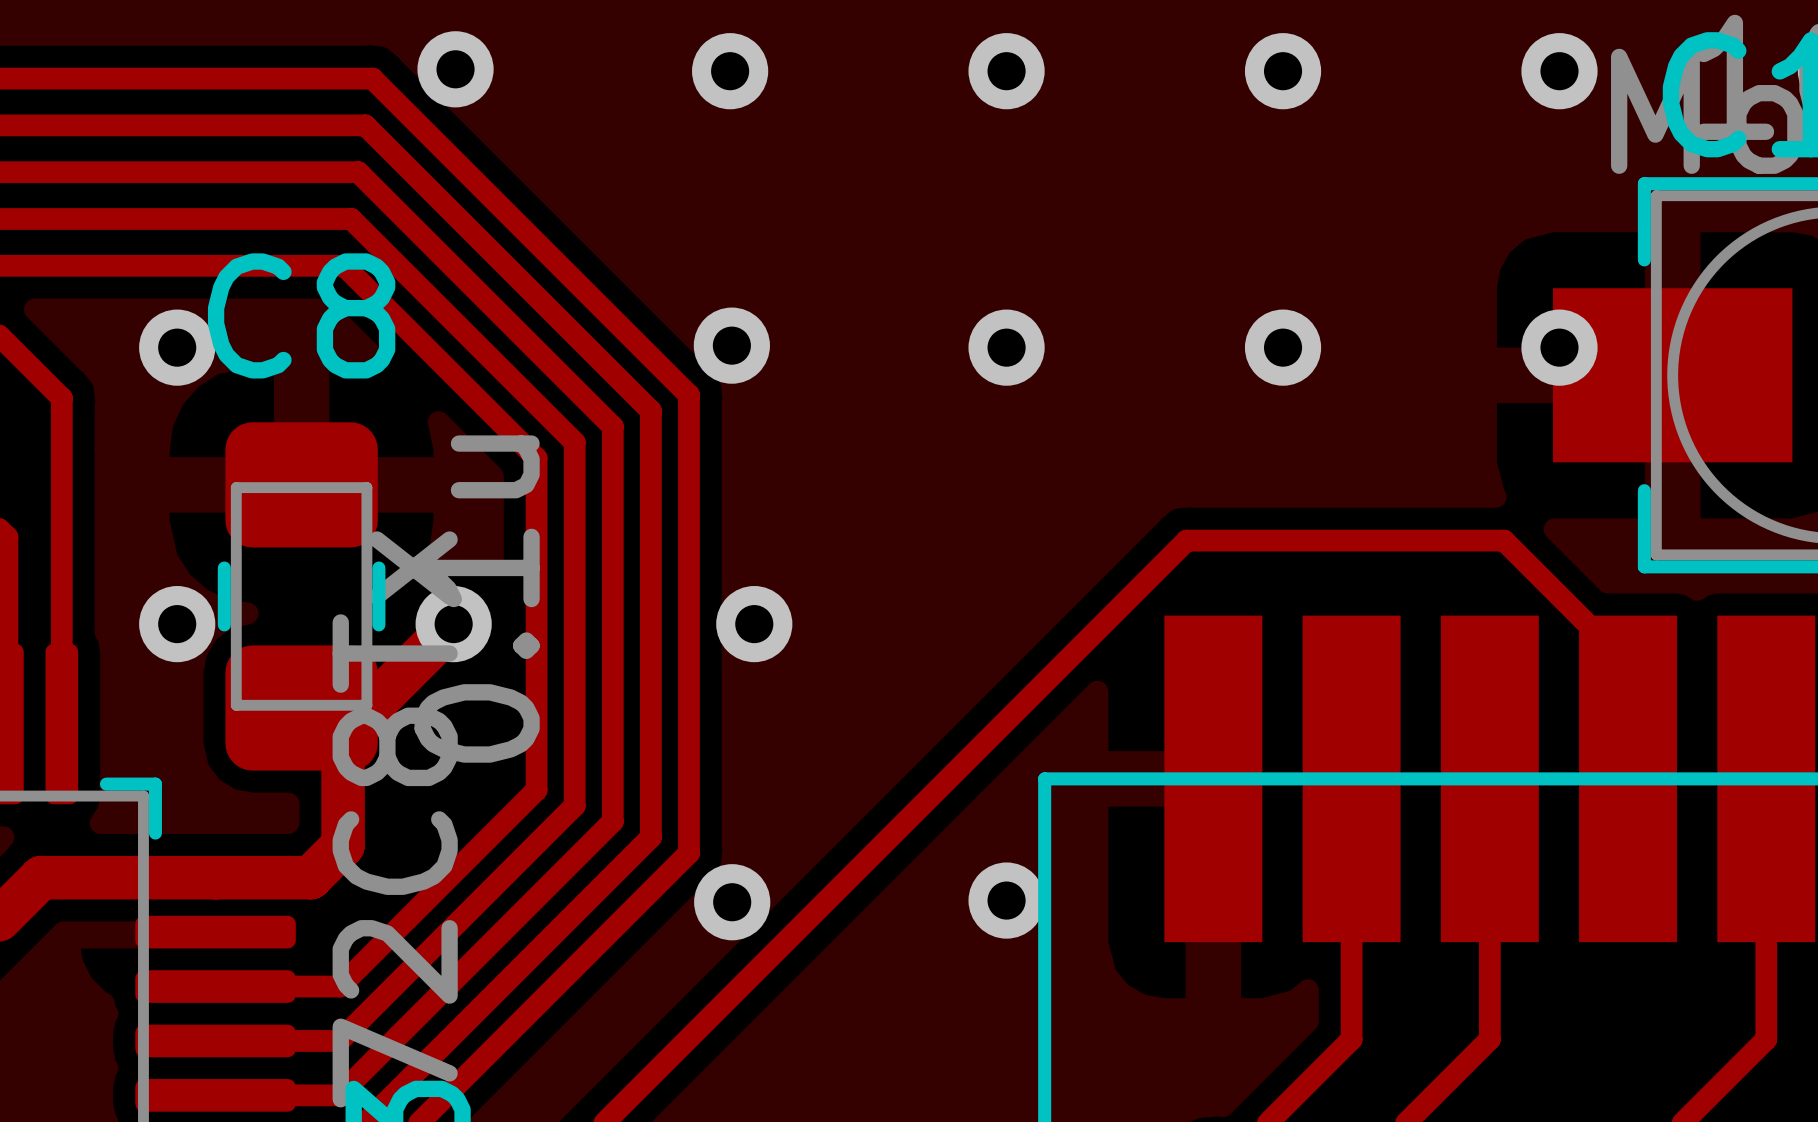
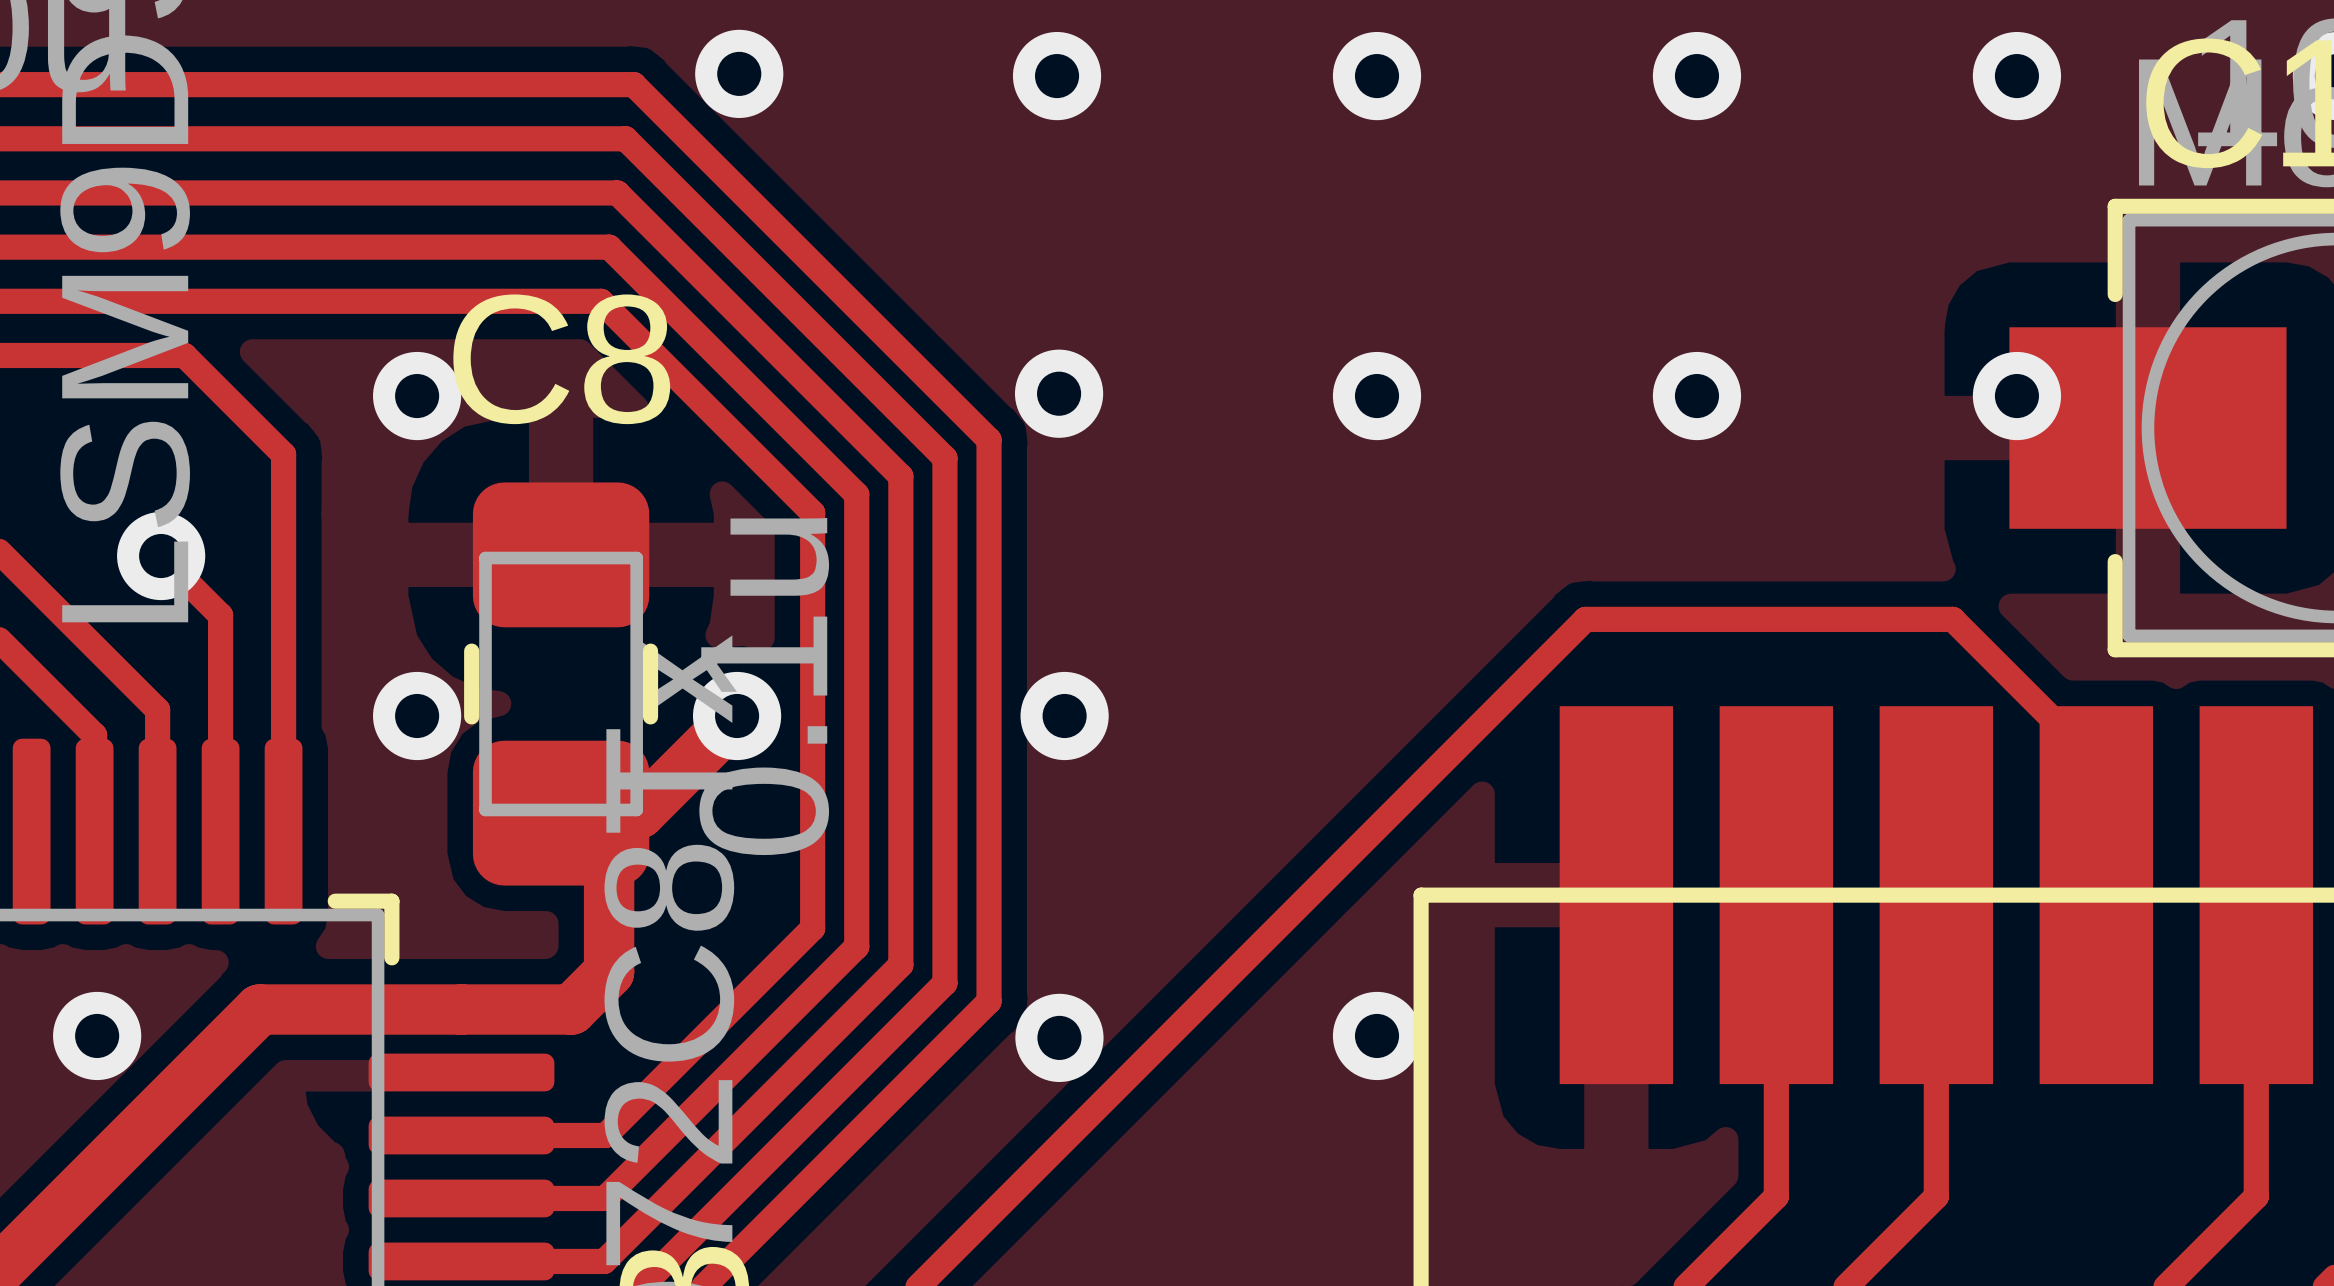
track: (364, 78) (372, 78) (688, 395) (688, 853) (671, 870) -> (633, 84) (989, 439) (989, 1001)
track: (357, 125) (365, 125) (650, 410) (650, 837) (633, 854) -> (625, 138) (944, 458) (944, 983)
track: (350, 172) (358, 172) (612, 426) (612, 821) (595, 839) -> (617, 192) (900, 476) (900, 964)
track: (343, 218) (351, 218) (574, 442) (574, 805) (557, 823) -> (609, 247) (856, 494) (856, 946)
track: (336, 265) (344, 265) (536, 458) (536, 789) (518, 807) -> (601, 301) (812, 512) (812, 928)
via position: (754, 624) -> (1064, 716)

